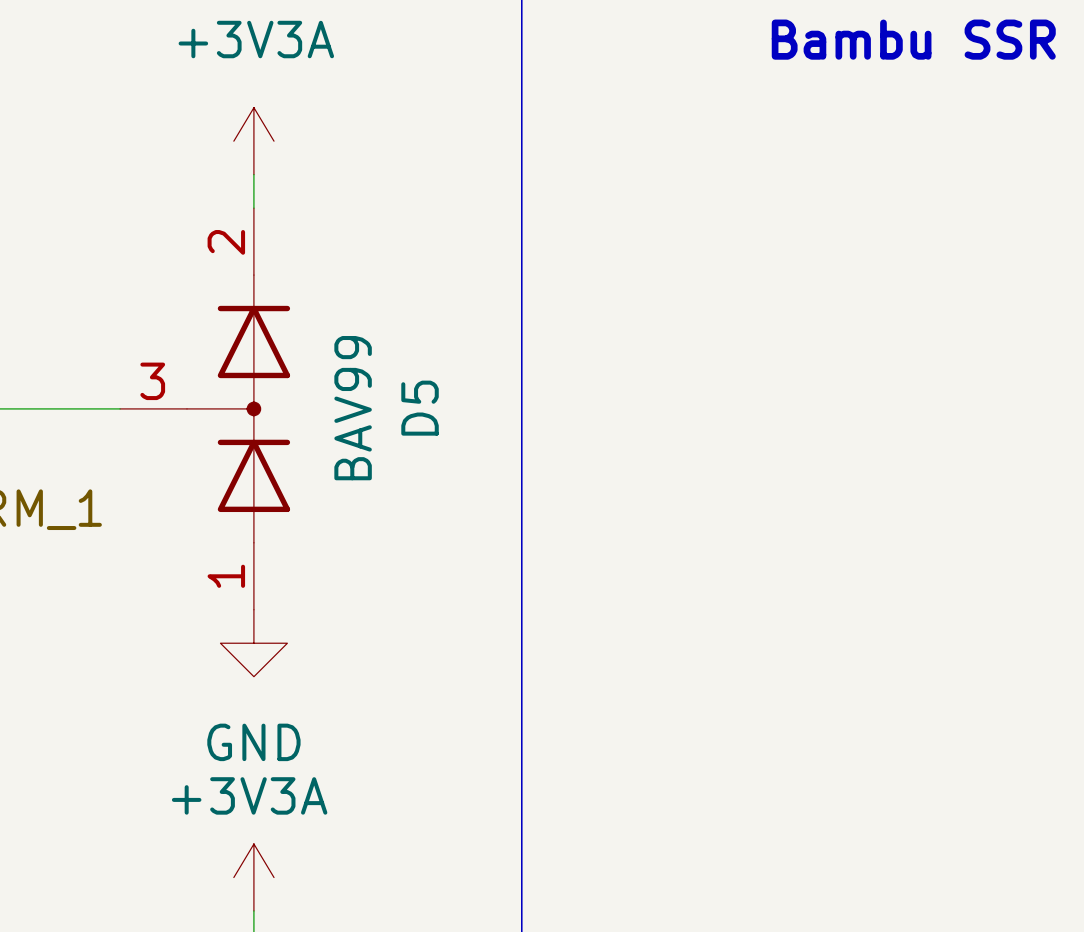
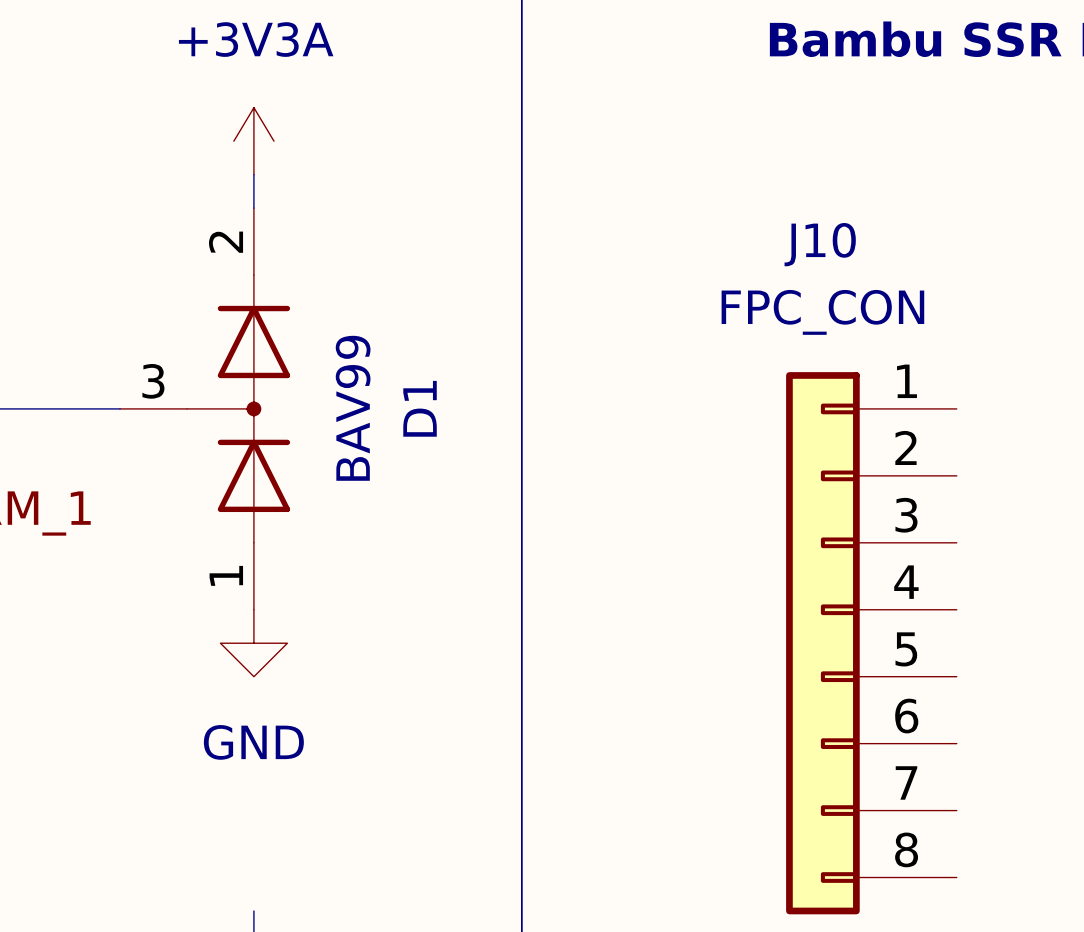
D5 name: D5 (420, 408) -> D1 (420, 408)
J10: none -> FPC_CON (871, 643)
power symbol: +3V3A (253, 877) -> none

